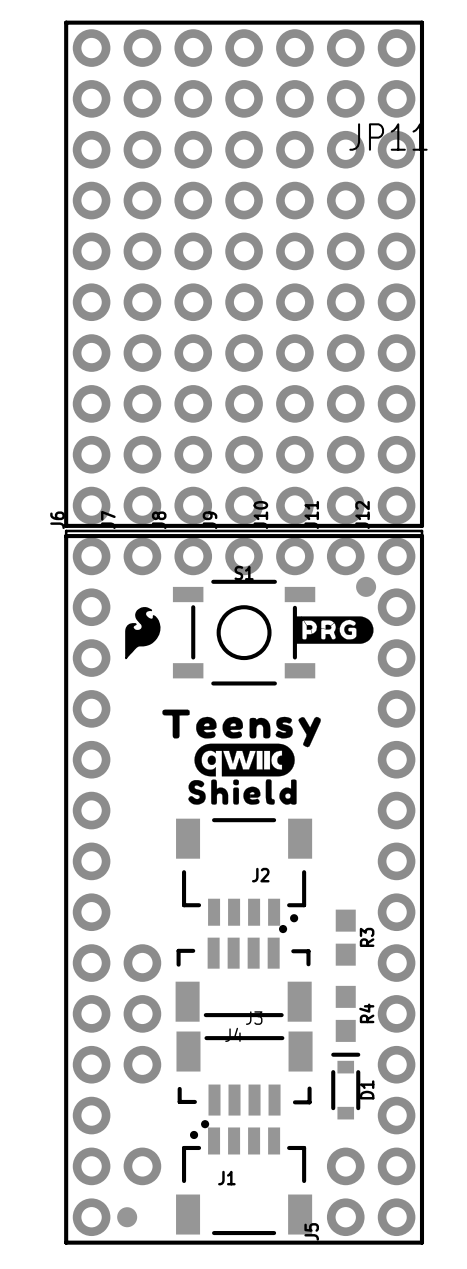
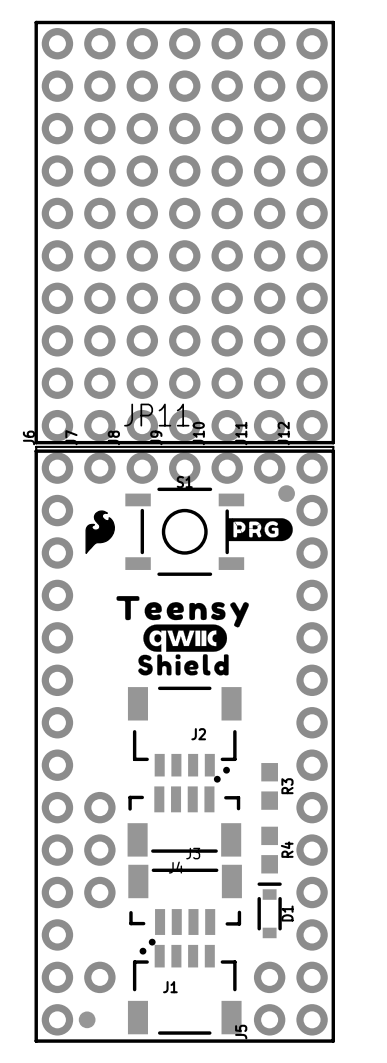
JP11 name position: JP11 (388, 137) -> JP11 (156, 415)

